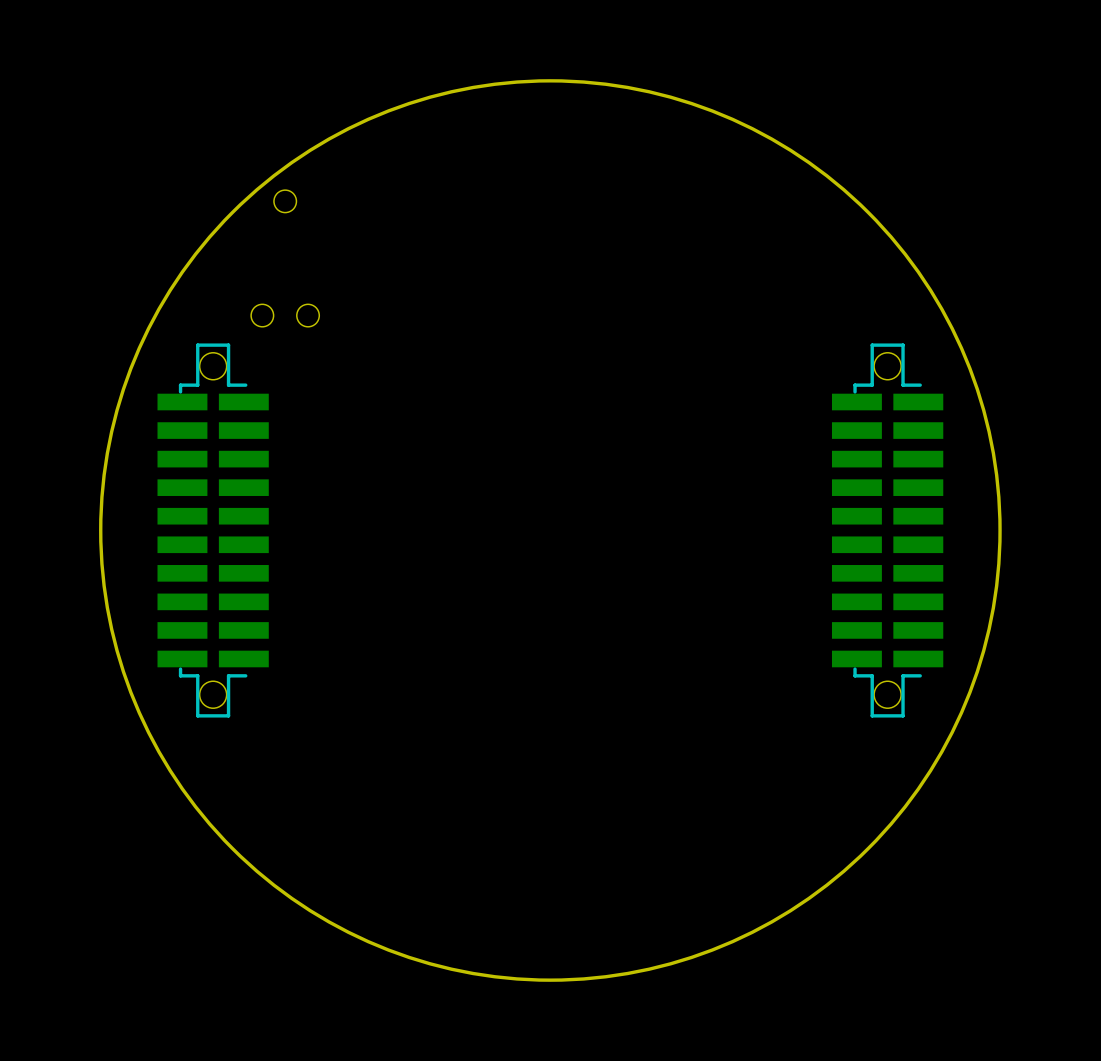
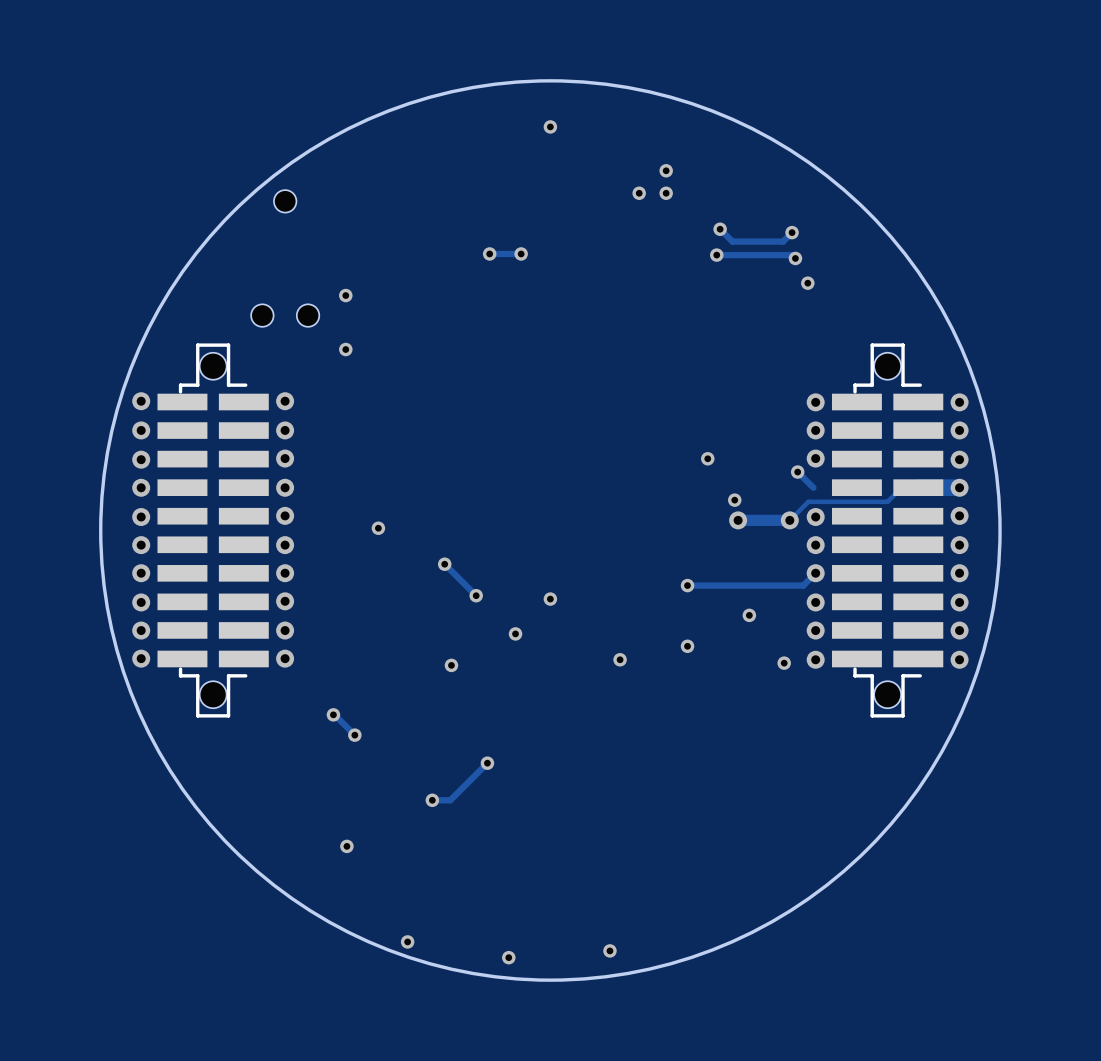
via: none -> (550, 126)
via: none -> (666, 170)
via: none -> (639, 193)
via: none -> (666, 193)
track: none -> (720, 229) (732, 241) (783, 241) (792, 232)
via: none -> (720, 229)
via: none -> (792, 232)
via: none -> (489, 253)
track: none -> (521, 253) (489, 253)
via: none -> (521, 253)
track: none -> (716, 255) (792, 255) (795, 258)
via: none -> (716, 255)
via: none -> (795, 258)
via: none -> (807, 283)
via: none -> (345, 295)
via: none -> (345, 349)
via: none -> (141, 401)
via: none -> (285, 401)
via: none -> (815, 402)
via: none -> (959, 402)
via: none -> (141, 430)
via: none -> (285, 430)
via: none -> (815, 430)
via: none -> (959, 430)
via: none -> (285, 458)
via: none -> (707, 458)
via: none -> (815, 458)
via: none -> (141, 459)
via: none -> (959, 459)
track: none -> (797, 472) (813, 487)
via: none -> (797, 472)
via: none -> (141, 487)
via: none -> (285, 487)
track: none -> (959, 487) (901, 487) (887, 501) (808, 501) (789, 520) (738, 520)
via: none -> (959, 487)
via: none -> (734, 500)
via: none -> (285, 515)
via: none -> (959, 515)
via: none -> (141, 517)
via: none -> (815, 517)
via: none -> (738, 520)
via: none -> (789, 520)
via: none -> (378, 528)
via: none -> (141, 545)
via: none -> (285, 545)
via: none -> (815, 545)
via: none -> (959, 545)
track: none -> (444, 564) (476, 595)
via: none -> (444, 564)
via: none -> (141, 573)
via: none -> (285, 573)
track: none -> (815, 573) (803, 585) (687, 585)
via: none -> (815, 573)
via: none -> (959, 573)
via: none -> (687, 585)
via: none -> (476, 595)
via: none -> (550, 599)
via: none -> (285, 601)
via: none -> (141, 602)
via: none -> (815, 602)
via: none -> (959, 602)
via: none -> (749, 615)
via: none -> (141, 630)
via: none -> (285, 630)
via: none -> (815, 630)
via: none -> (959, 630)
via: none -> (515, 633)
via: none -> (687, 646)
via: none -> (141, 658)
via: none -> (285, 658)
via: none -> (620, 659)
via: none -> (815, 659)
via: none -> (959, 659)
via: none -> (784, 663)
via: none -> (451, 665)
track: none -> (333, 714) (354, 735)
via: none -> (333, 714)
via: none -> (354, 735)
track: none -> (487, 763) (450, 800) (432, 800)
via: none -> (487, 763)
via: none -> (432, 800)
via: none -> (346, 846)
via: none -> (407, 941)
via: none -> (609, 950)
via: none -> (508, 957)

